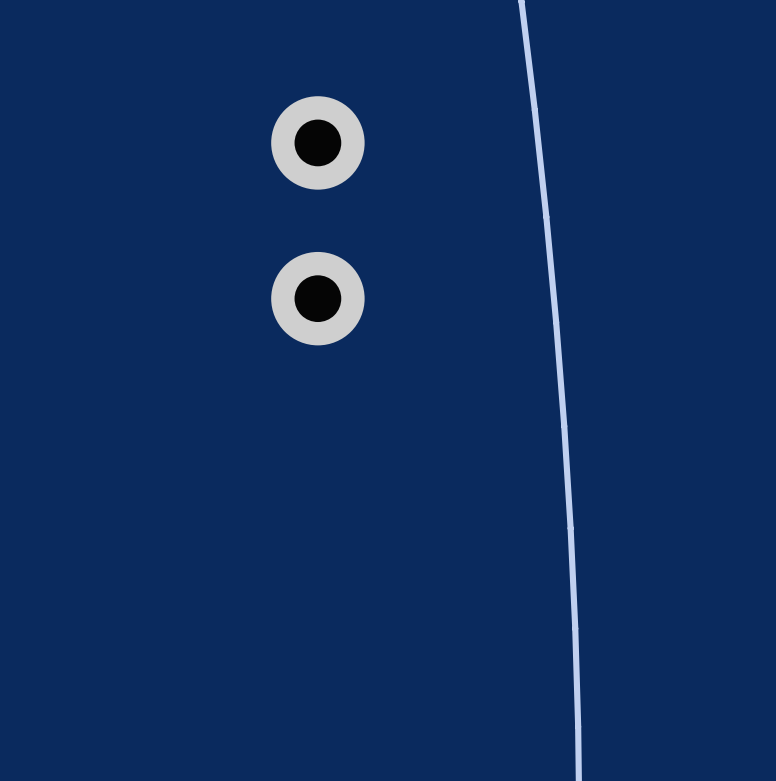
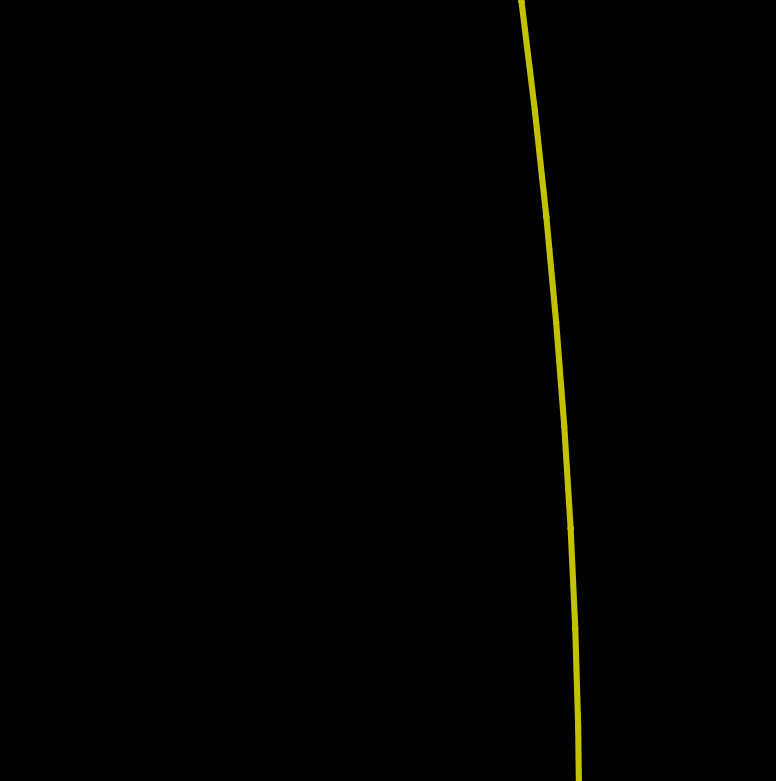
part: (317, 220) -> none

